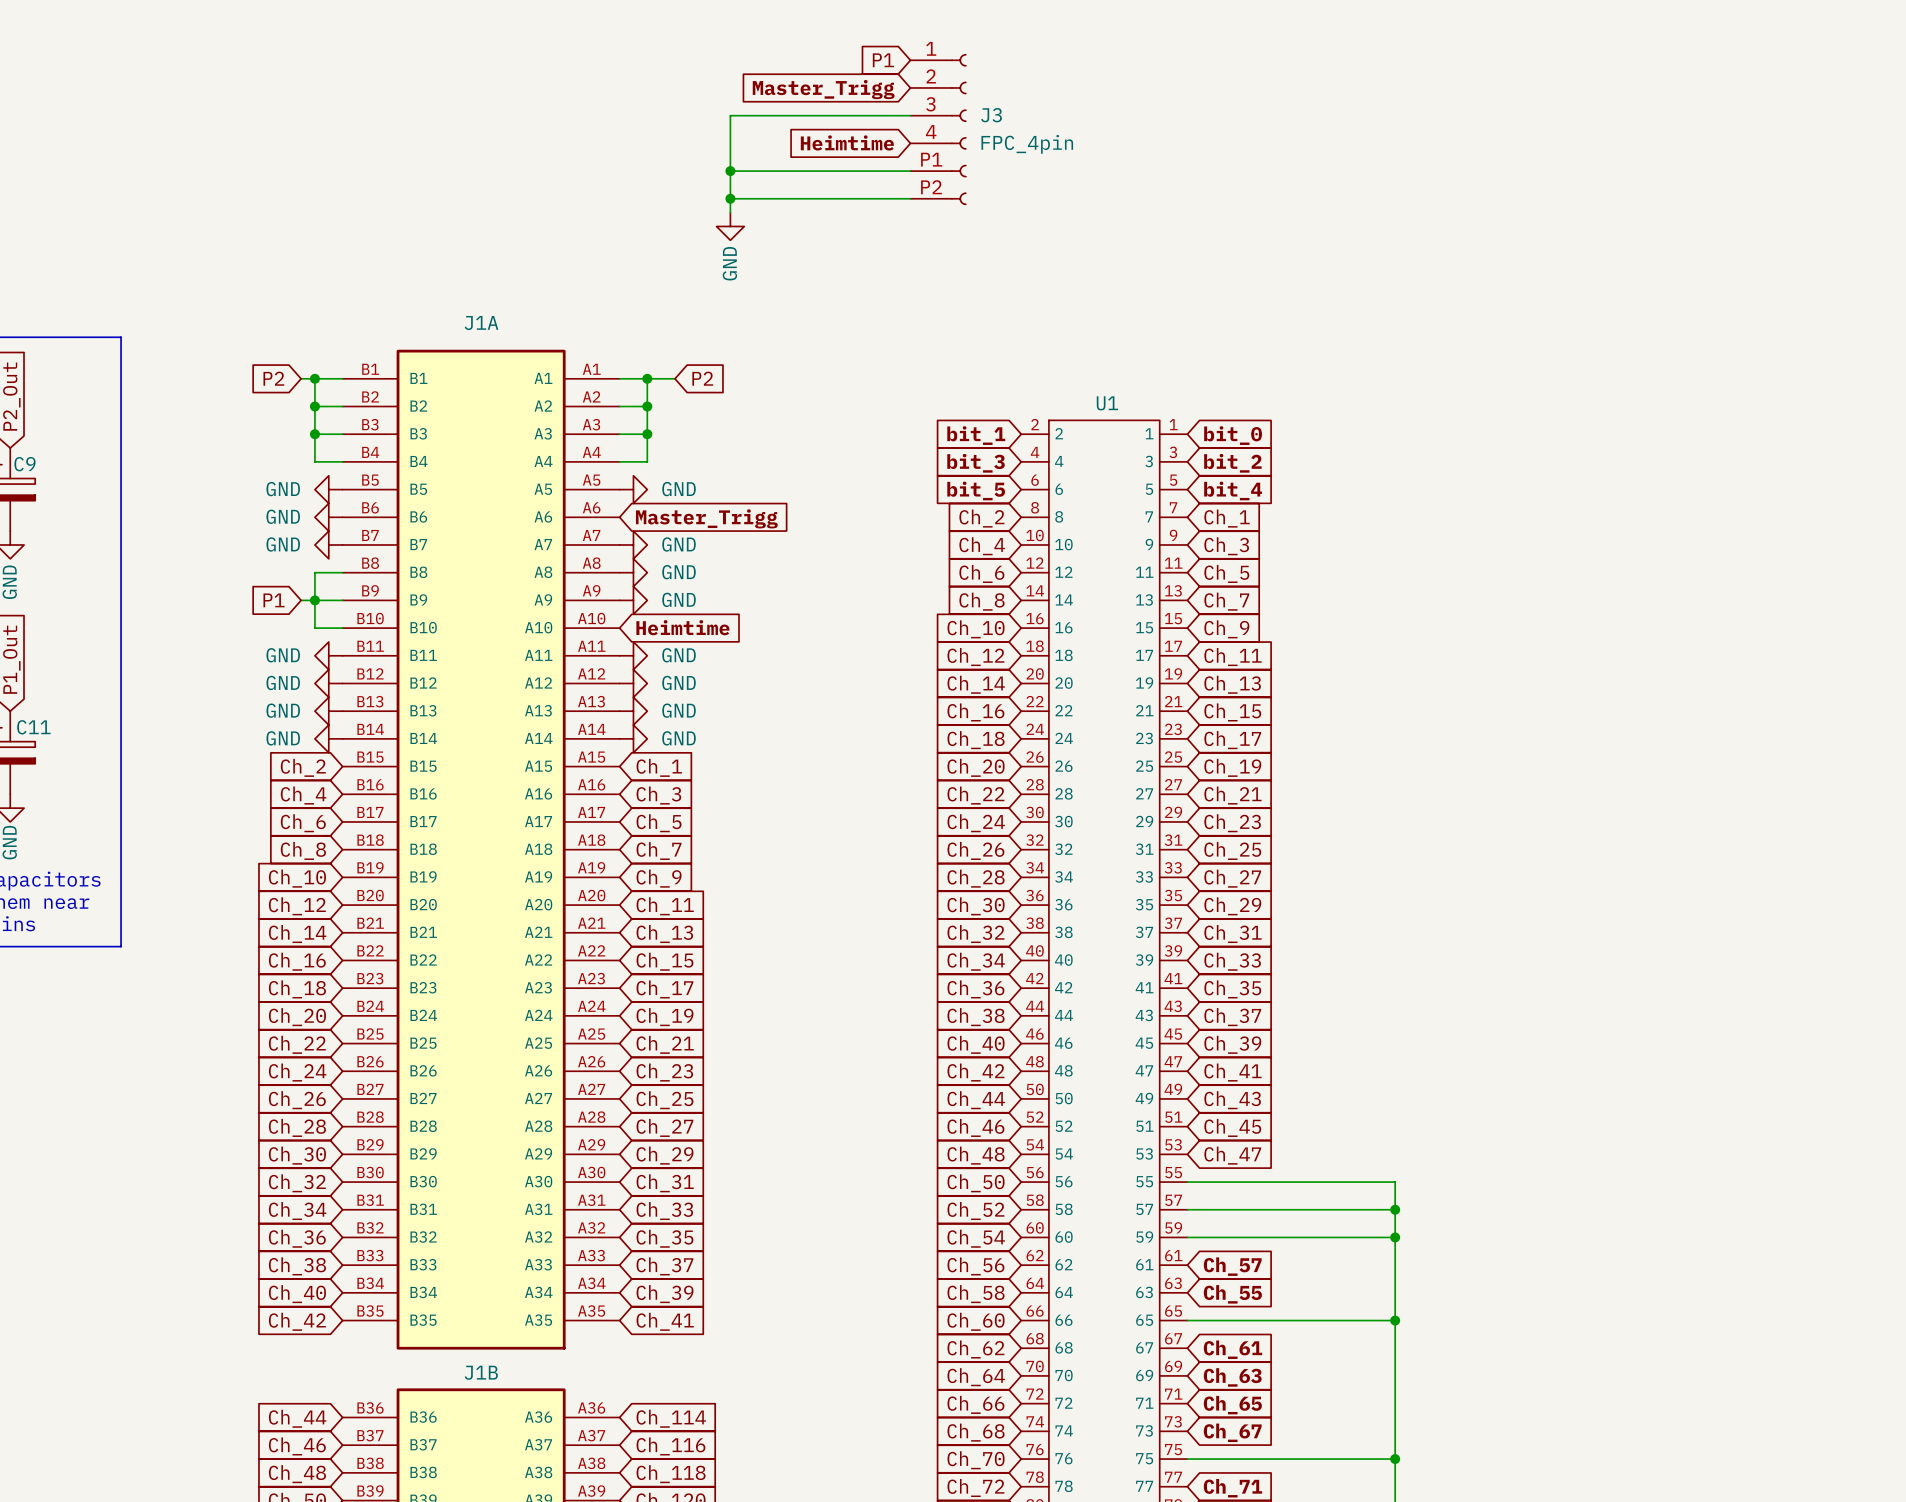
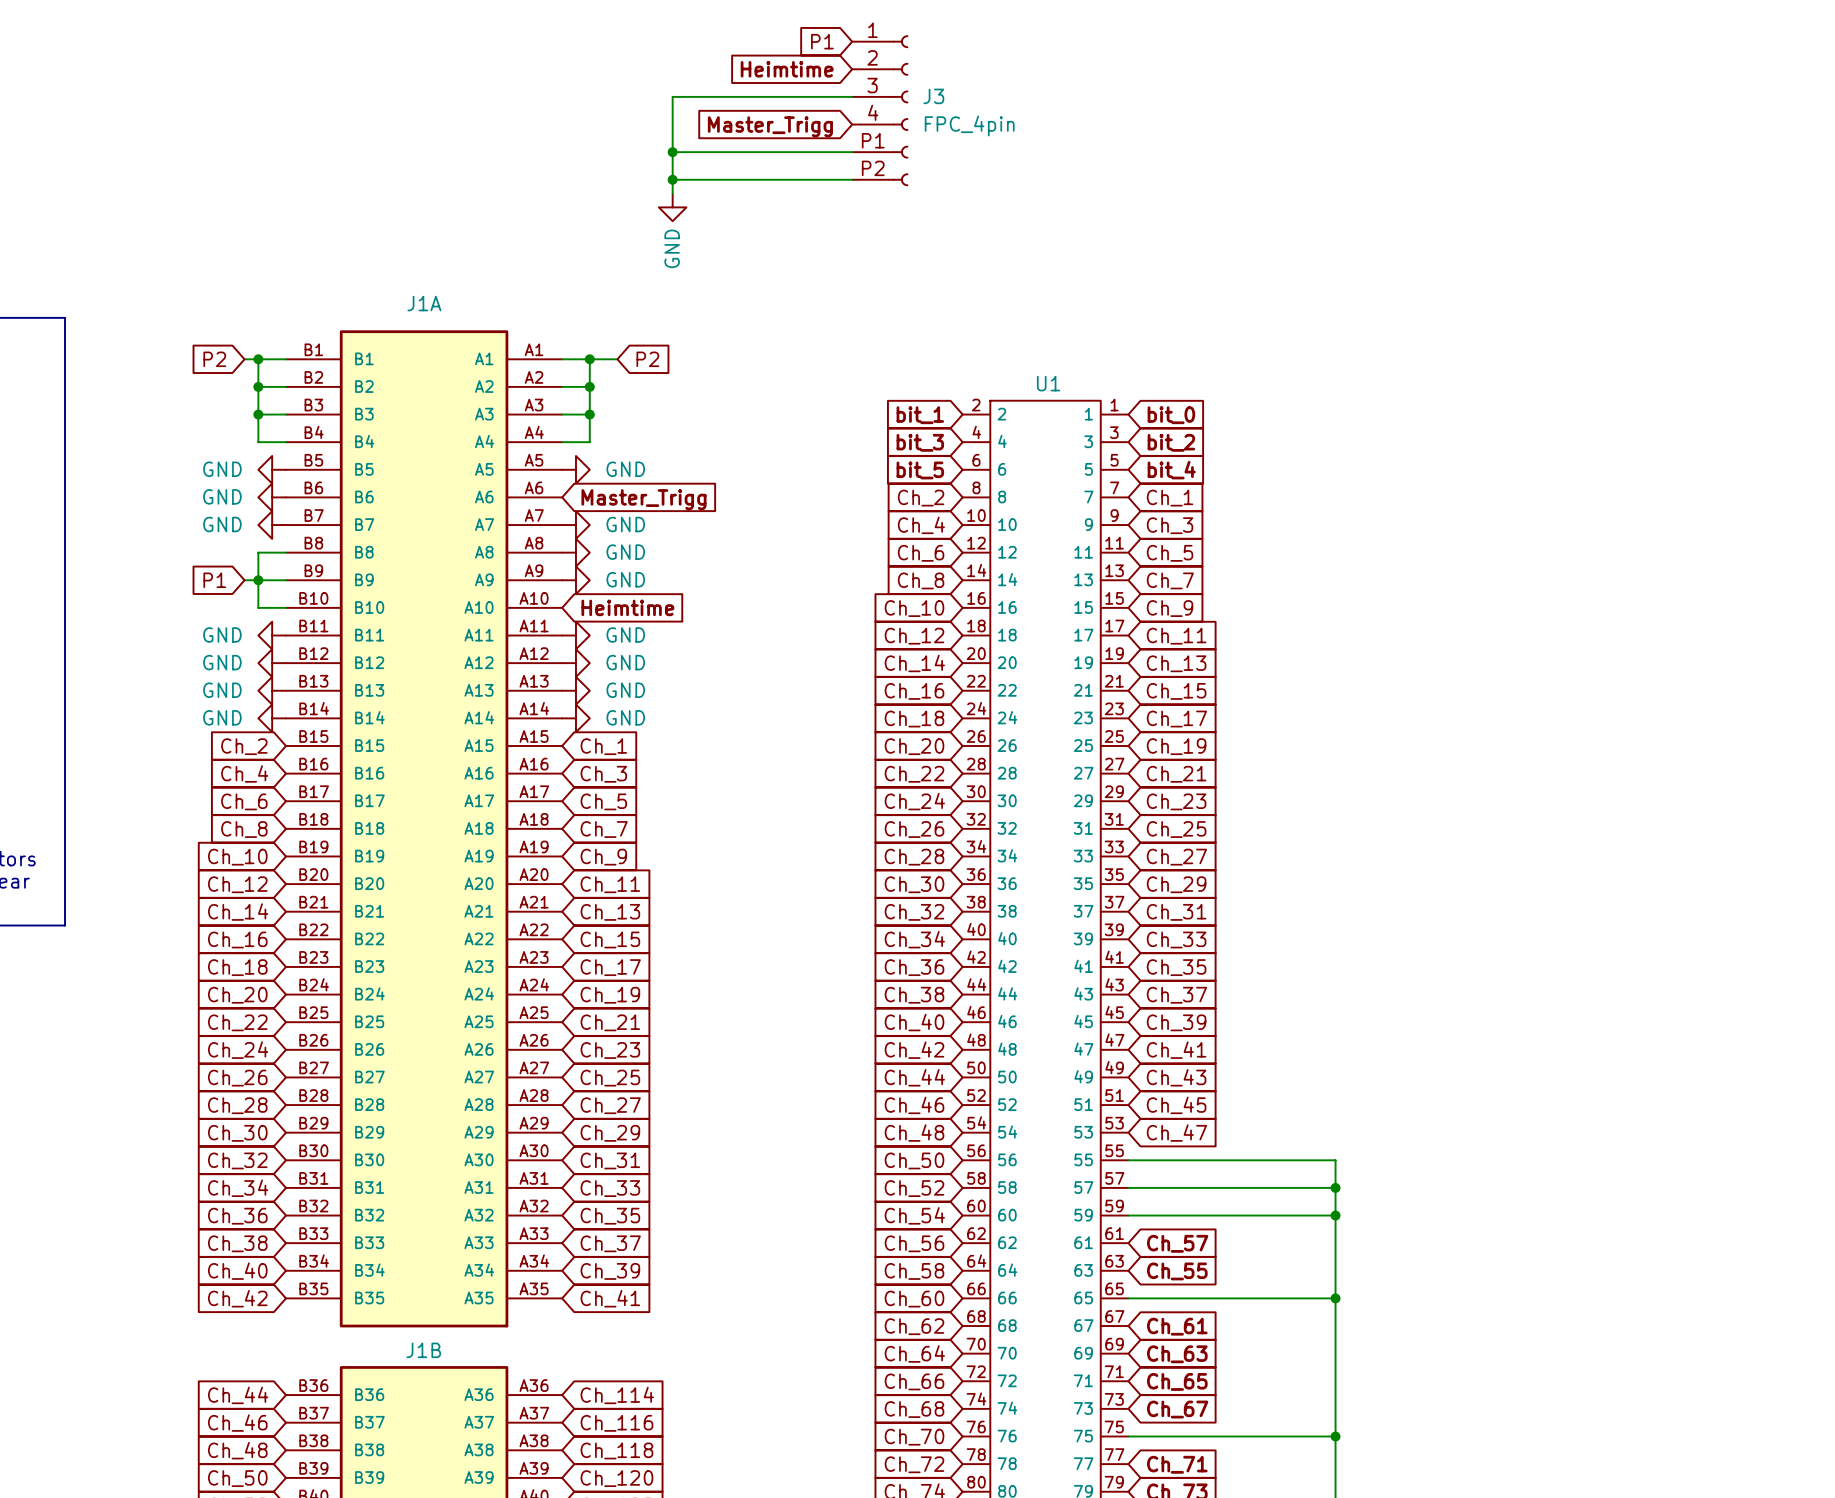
global label: Master_Trigg (823, 89) -> Heimtime (787, 69)
global label: Heimtime (847, 142) -> Master_Trigg (770, 126)

